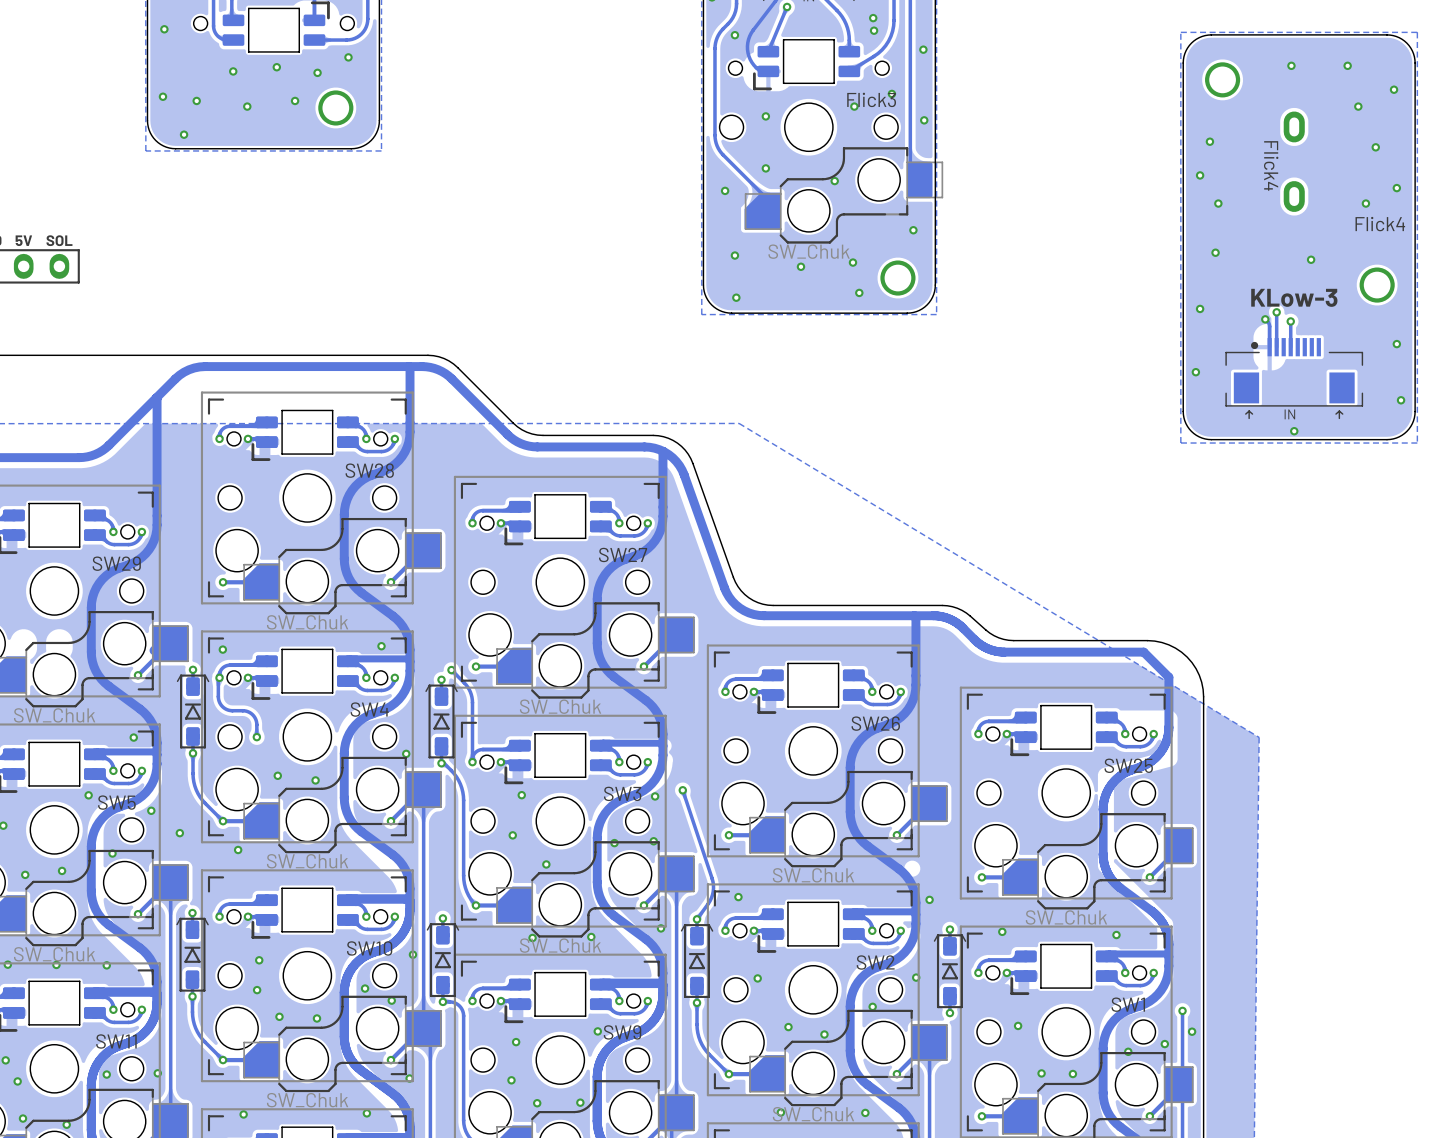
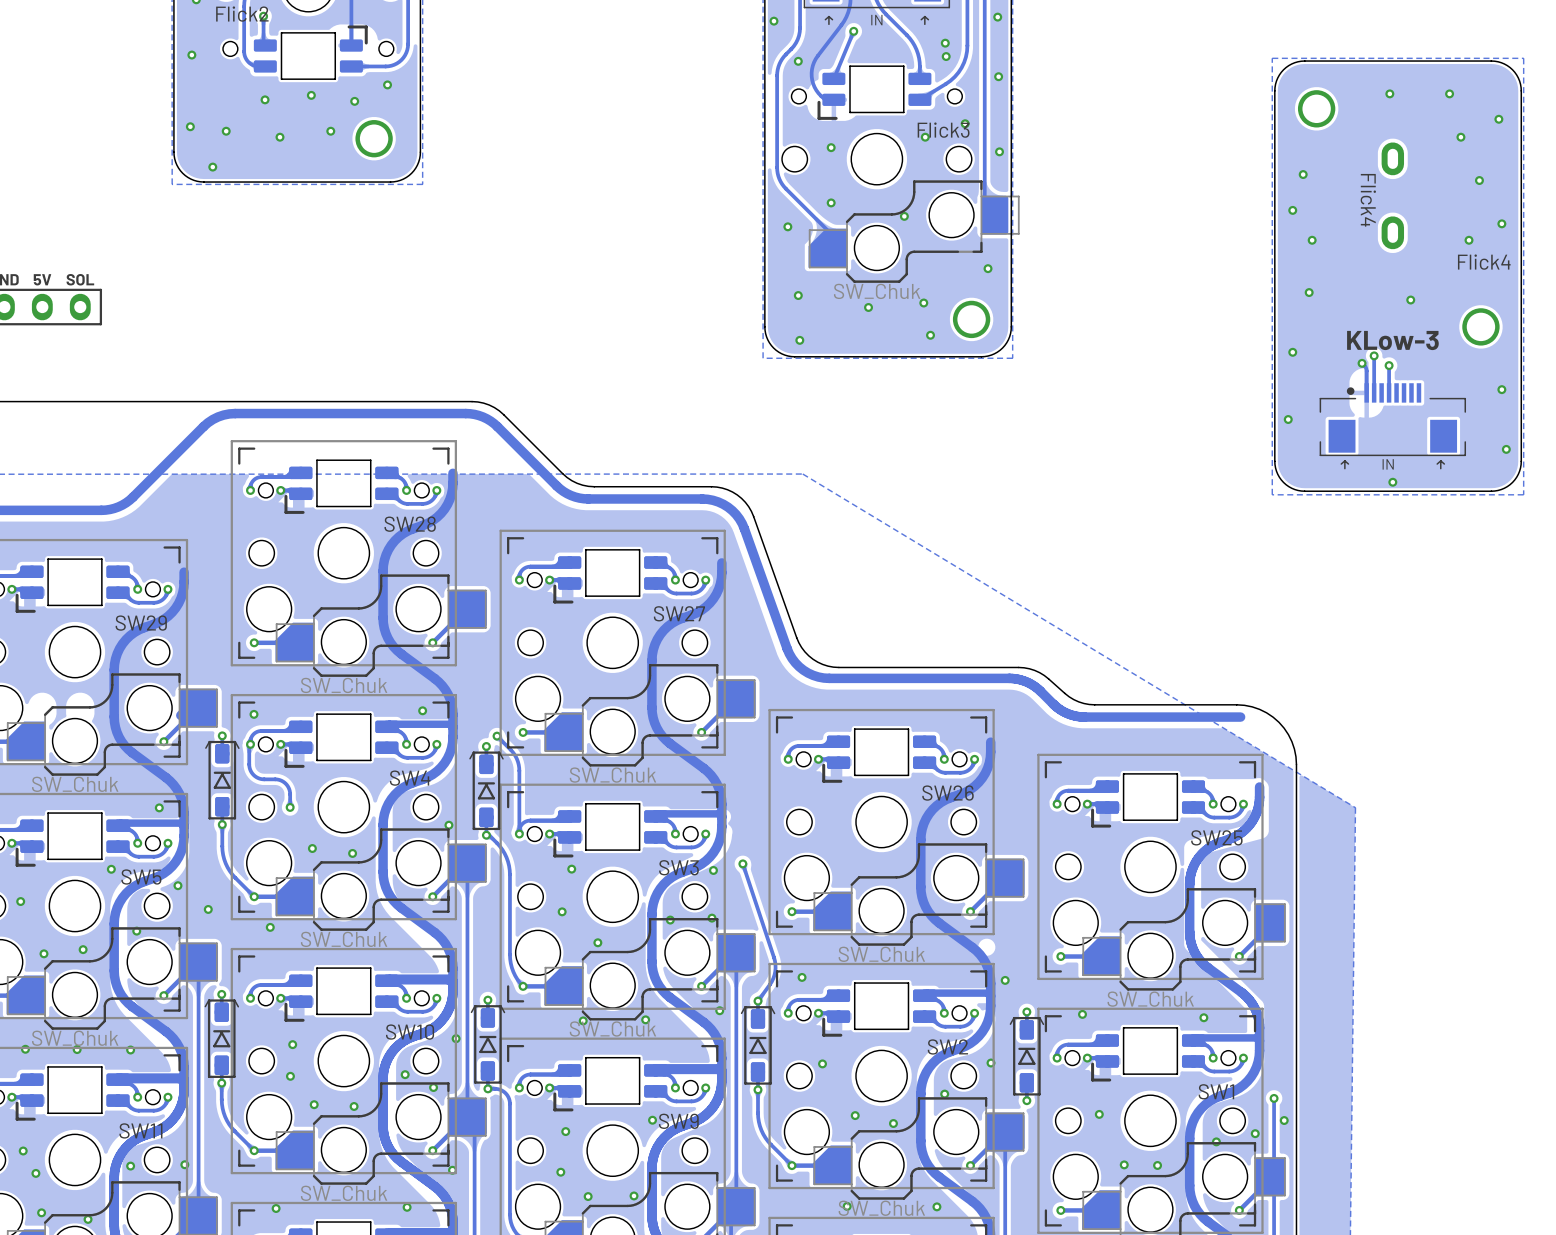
track: (408, 366) (410, 422) -> none
track: (156, 397) (157, 515) -> none
track: (663, 451) (662, 507) -> none
track: (914, 615) (915, 617) (915, 675) -> none
track: (1143, 652) (1168, 677) (1168, 717) -> (1232, 717) (1240, 717)

